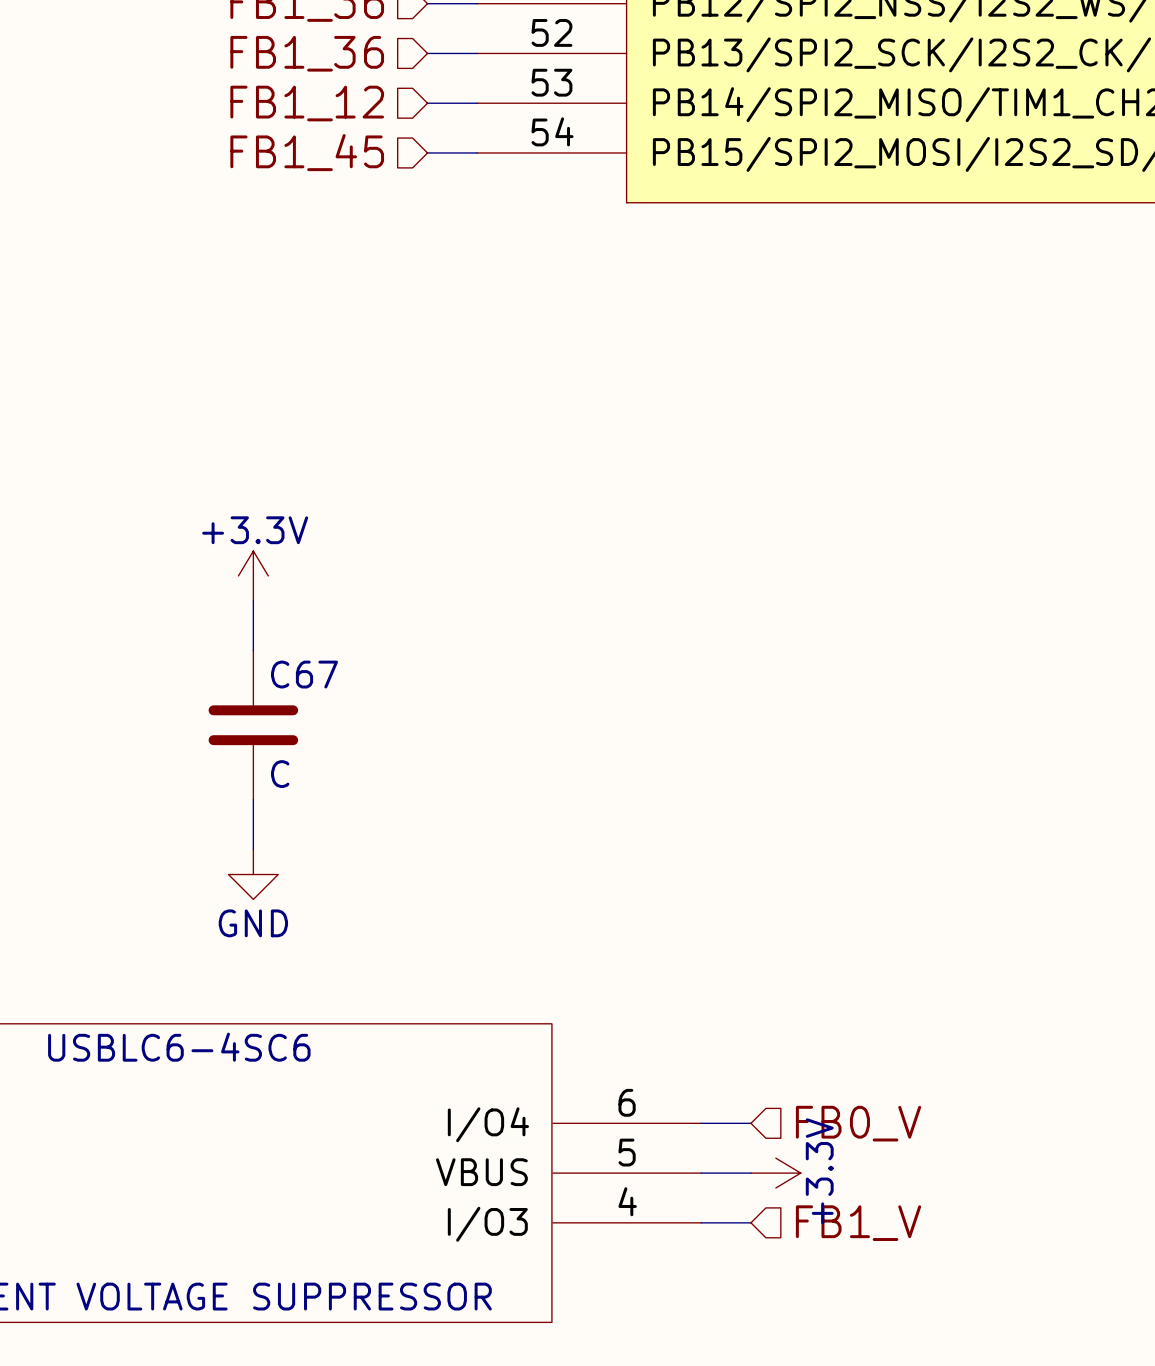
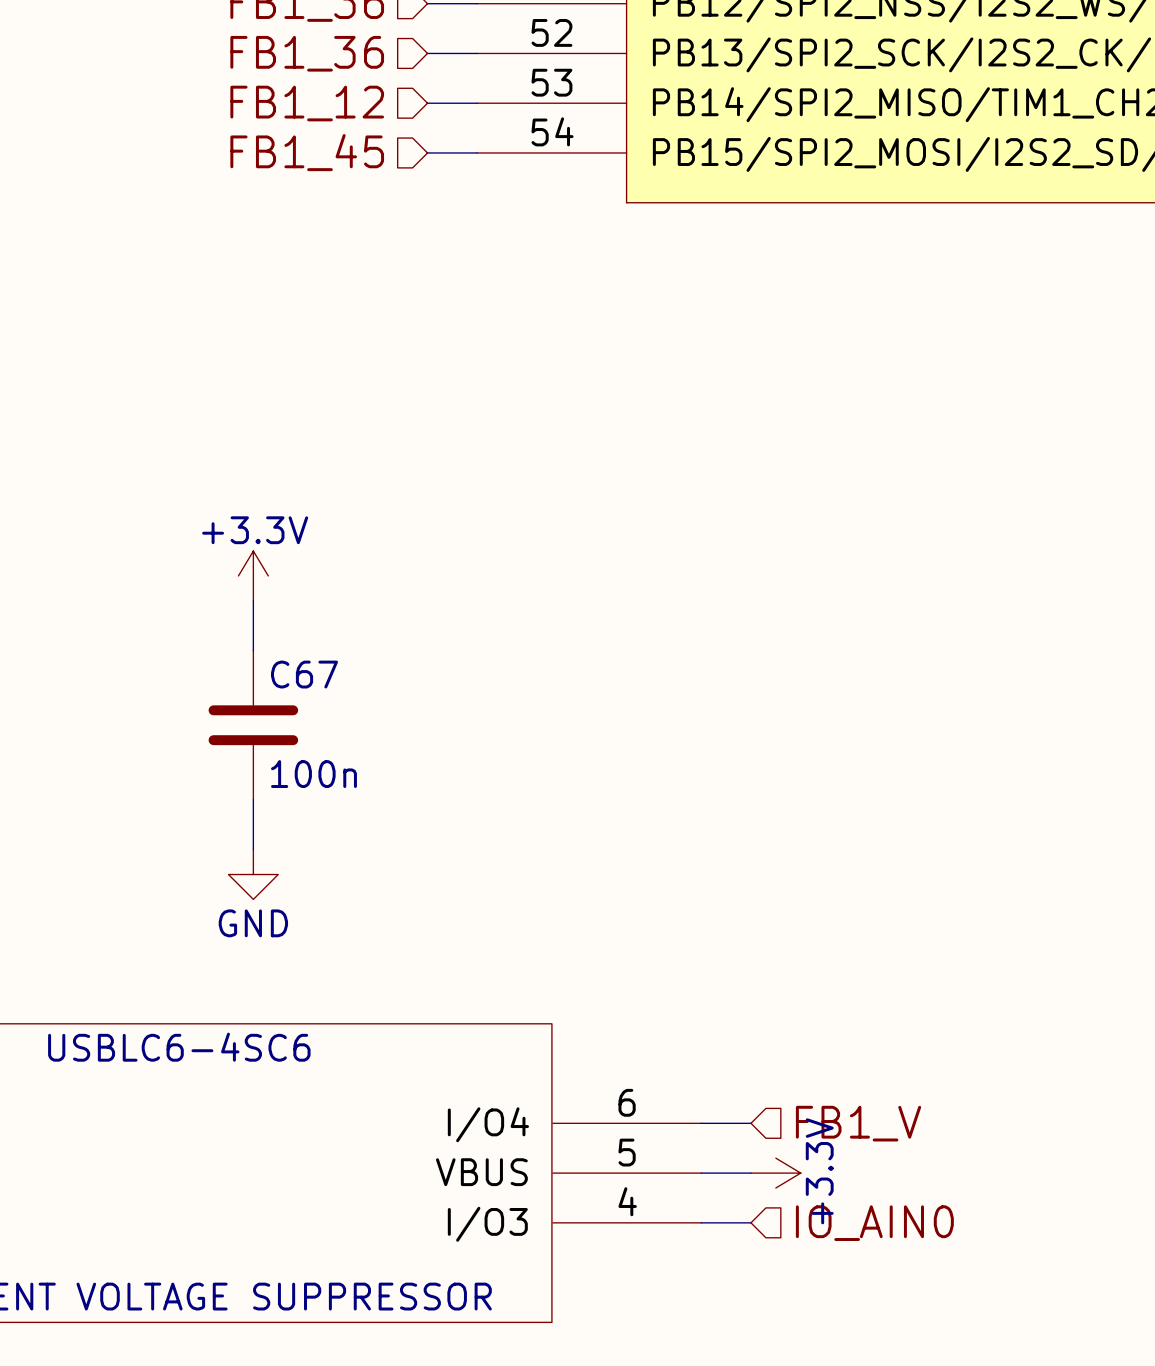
C67 value: C (280, 774) -> 100n (313, 774)
hierarchical label: FB0_V (858, 1123) -> FB1_V (858, 1123)
hierarchical label: FB1_V (858, 1223) -> IO_AIN0 (874, 1223)

